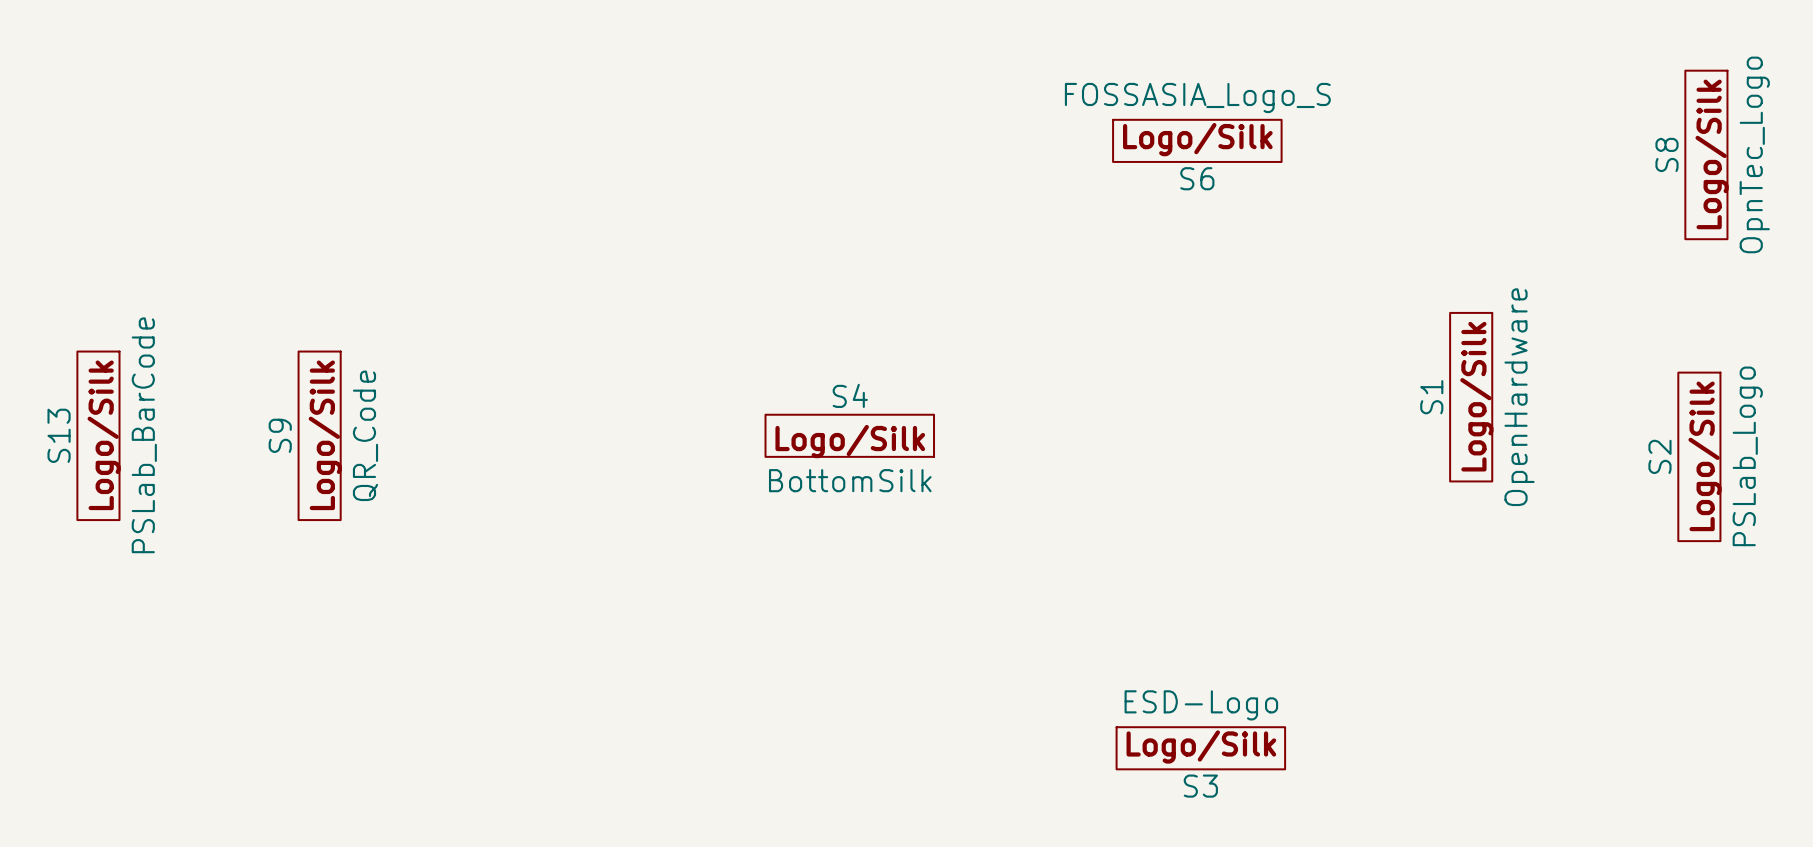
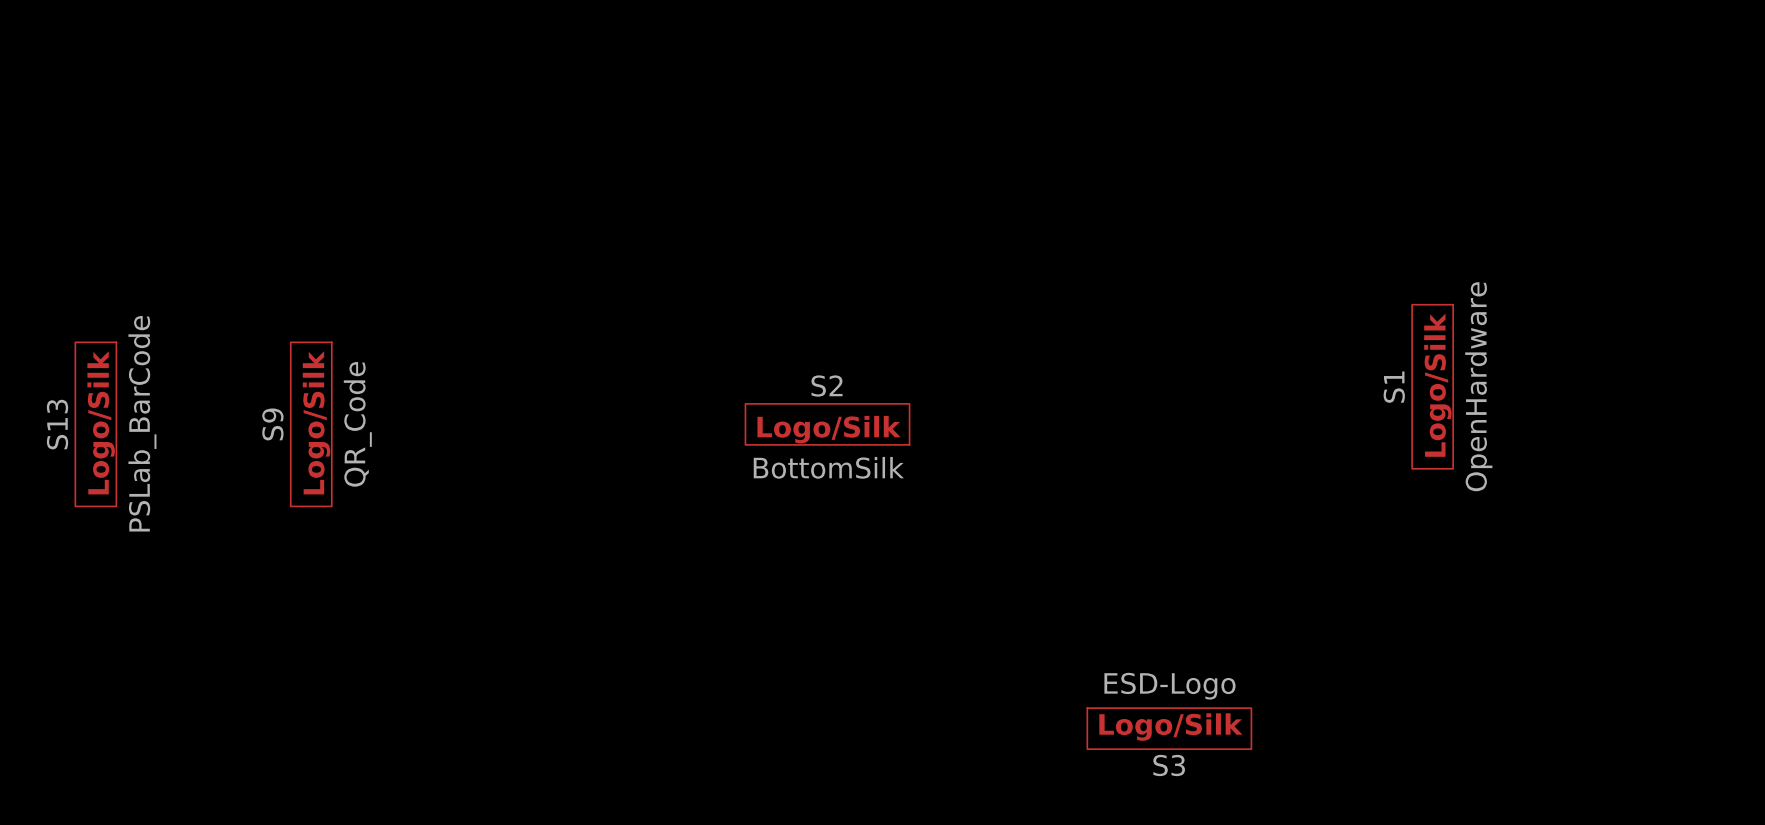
S6: FOSSASIA_Logo_S (1197, 140) -> none
S8: OpnTec_Logo (1706, 154) -> none
S4 name: S4 (850, 395) -> S2 (827, 386)
S2: PSLab_Logo (1699, 456) -> none

